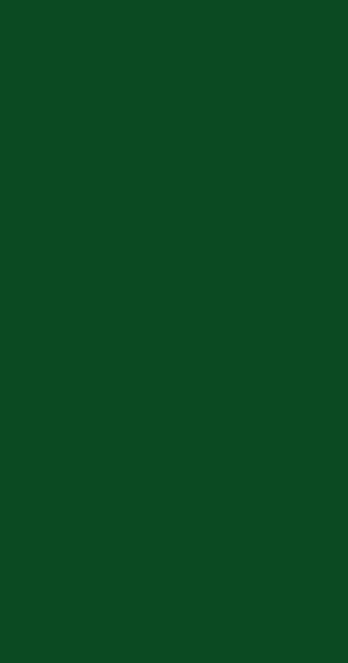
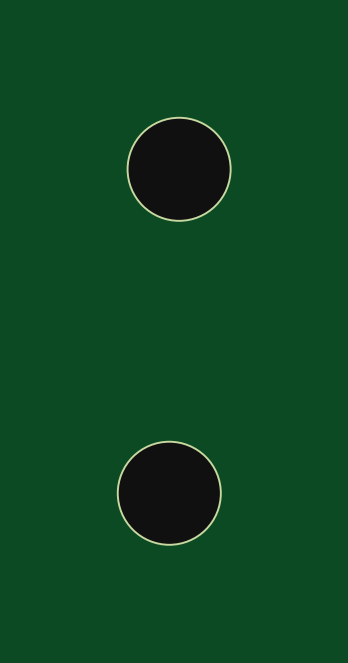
part: none -> (179, 169)
part: none -> (169, 493)

